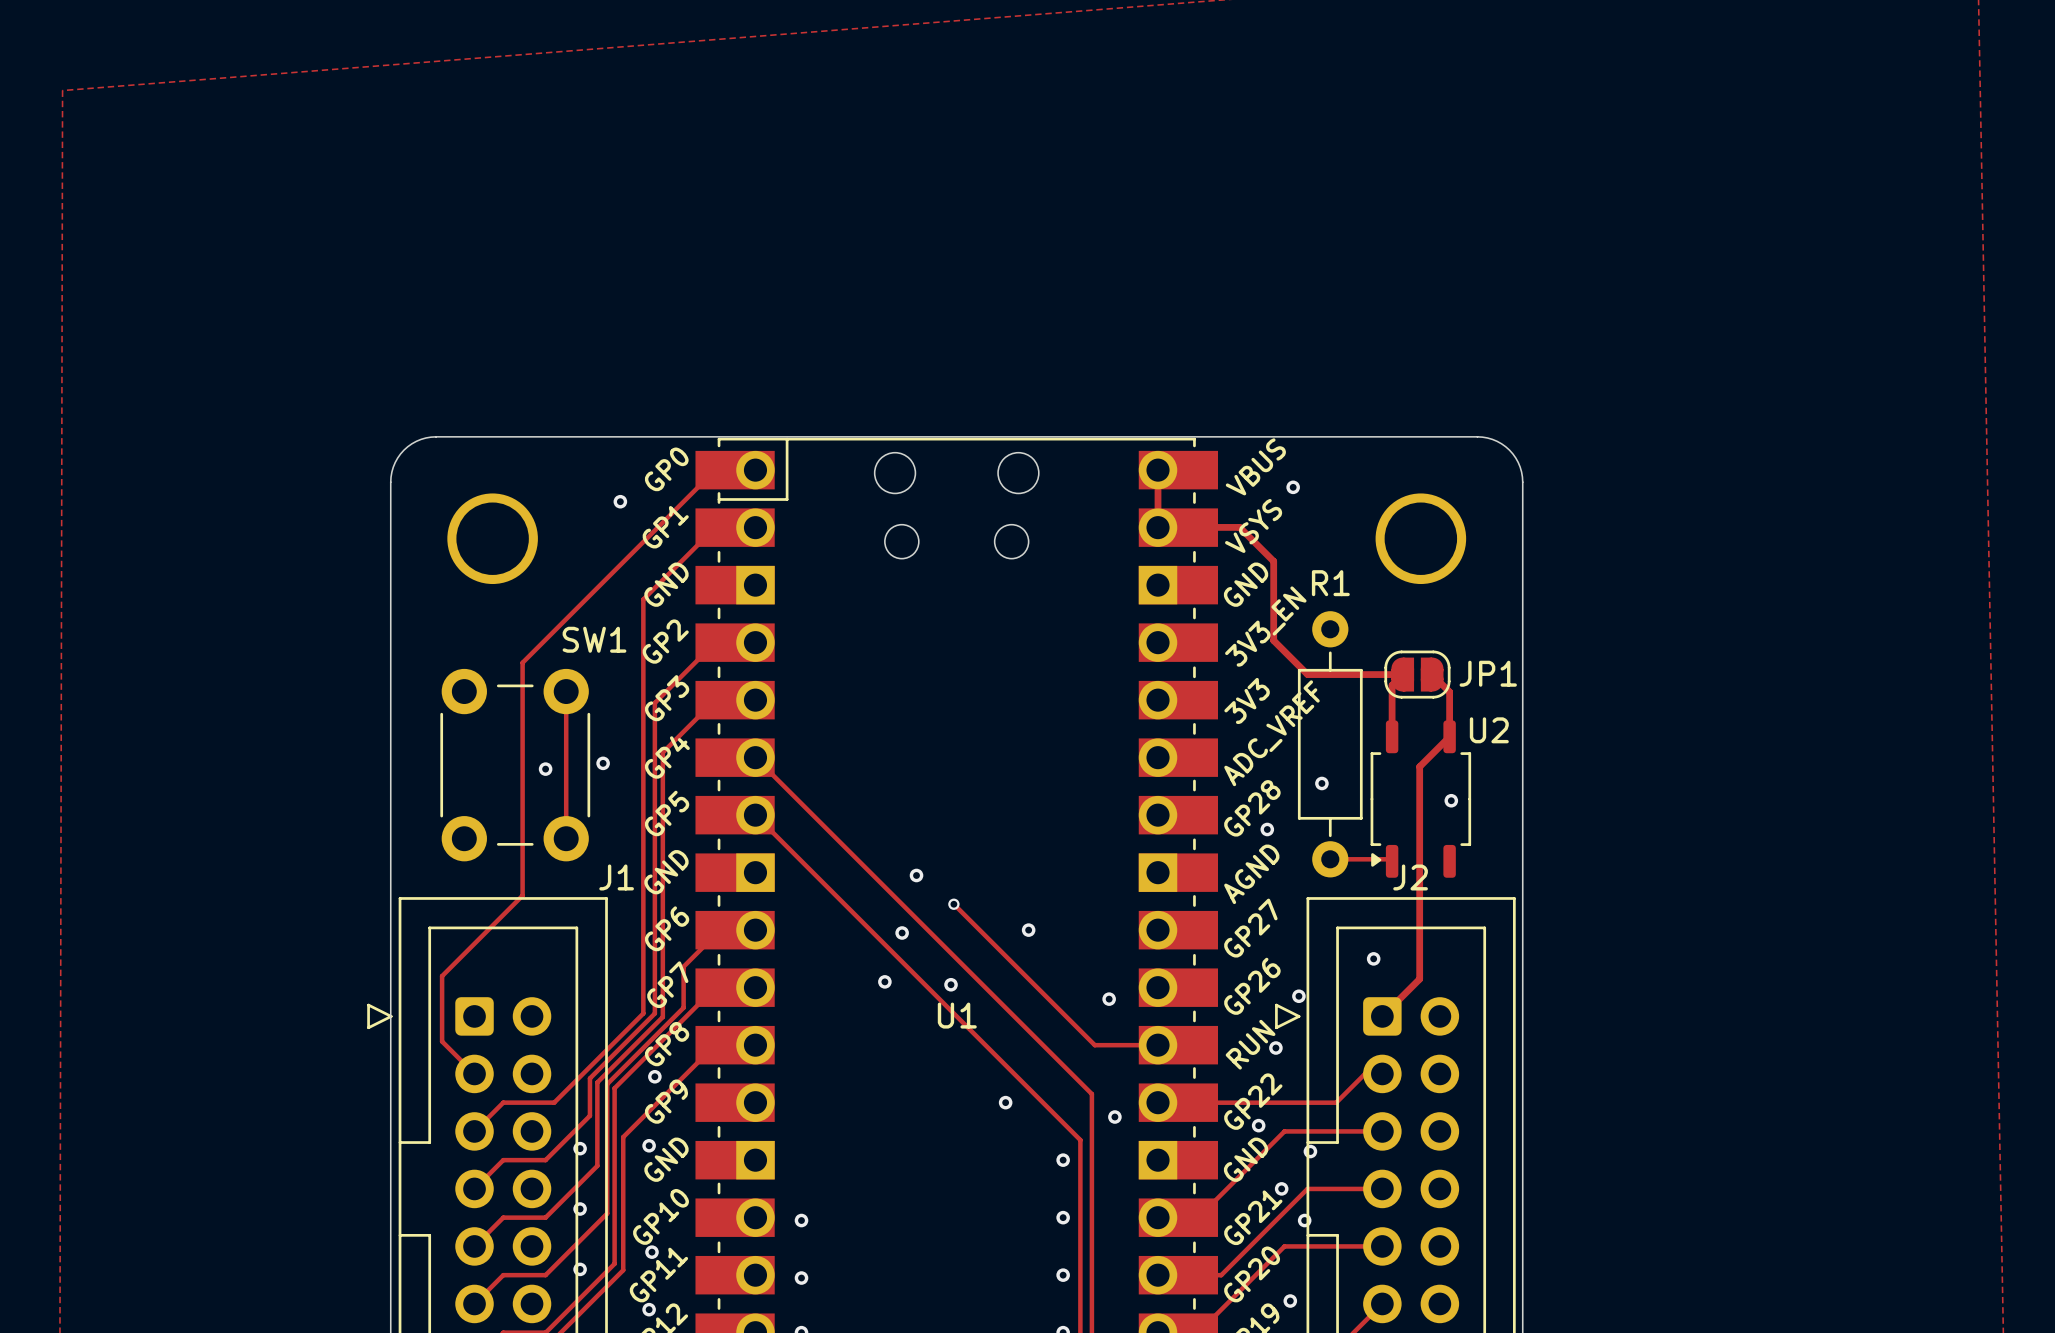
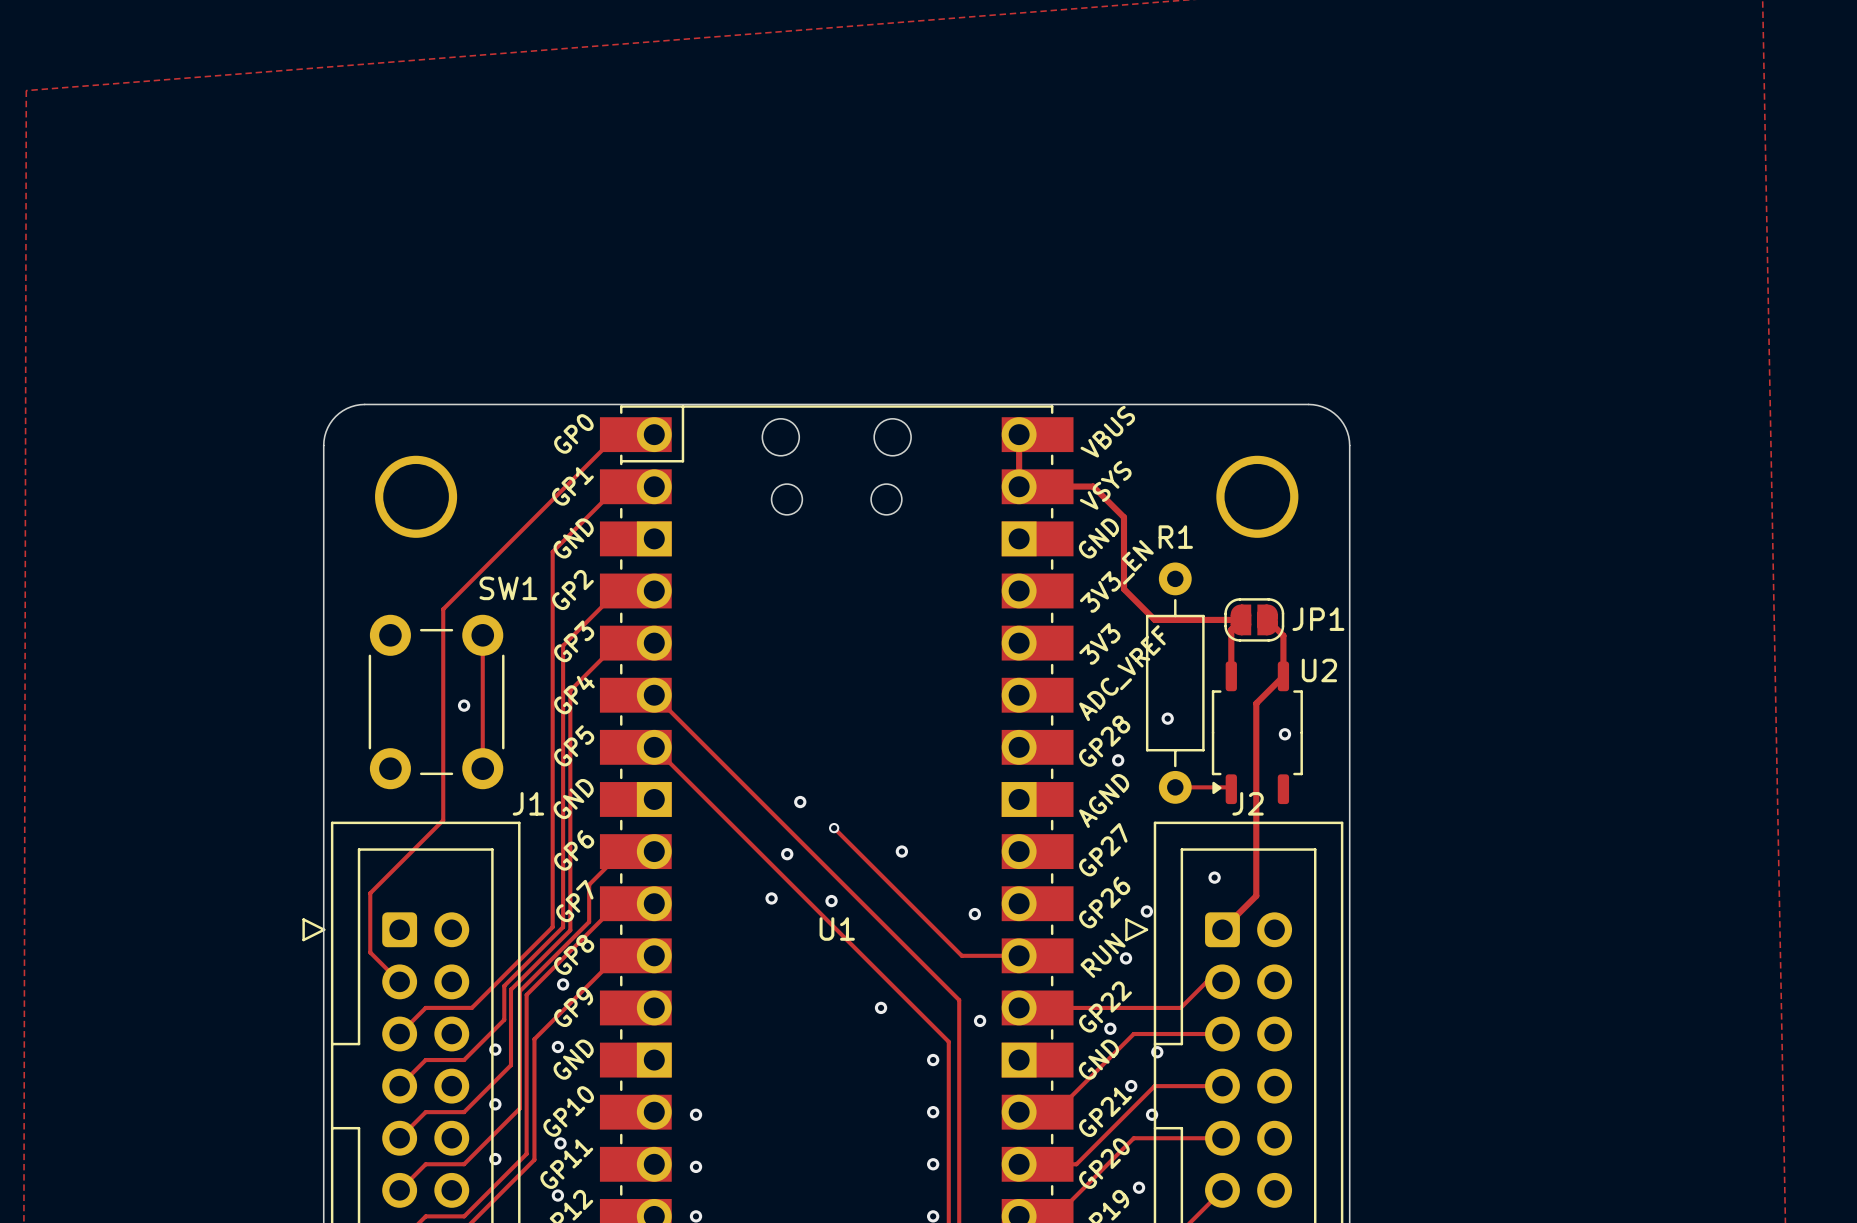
via: (1293, 487) -> none
via: (620, 501) -> none
via: (603, 763) -> none

